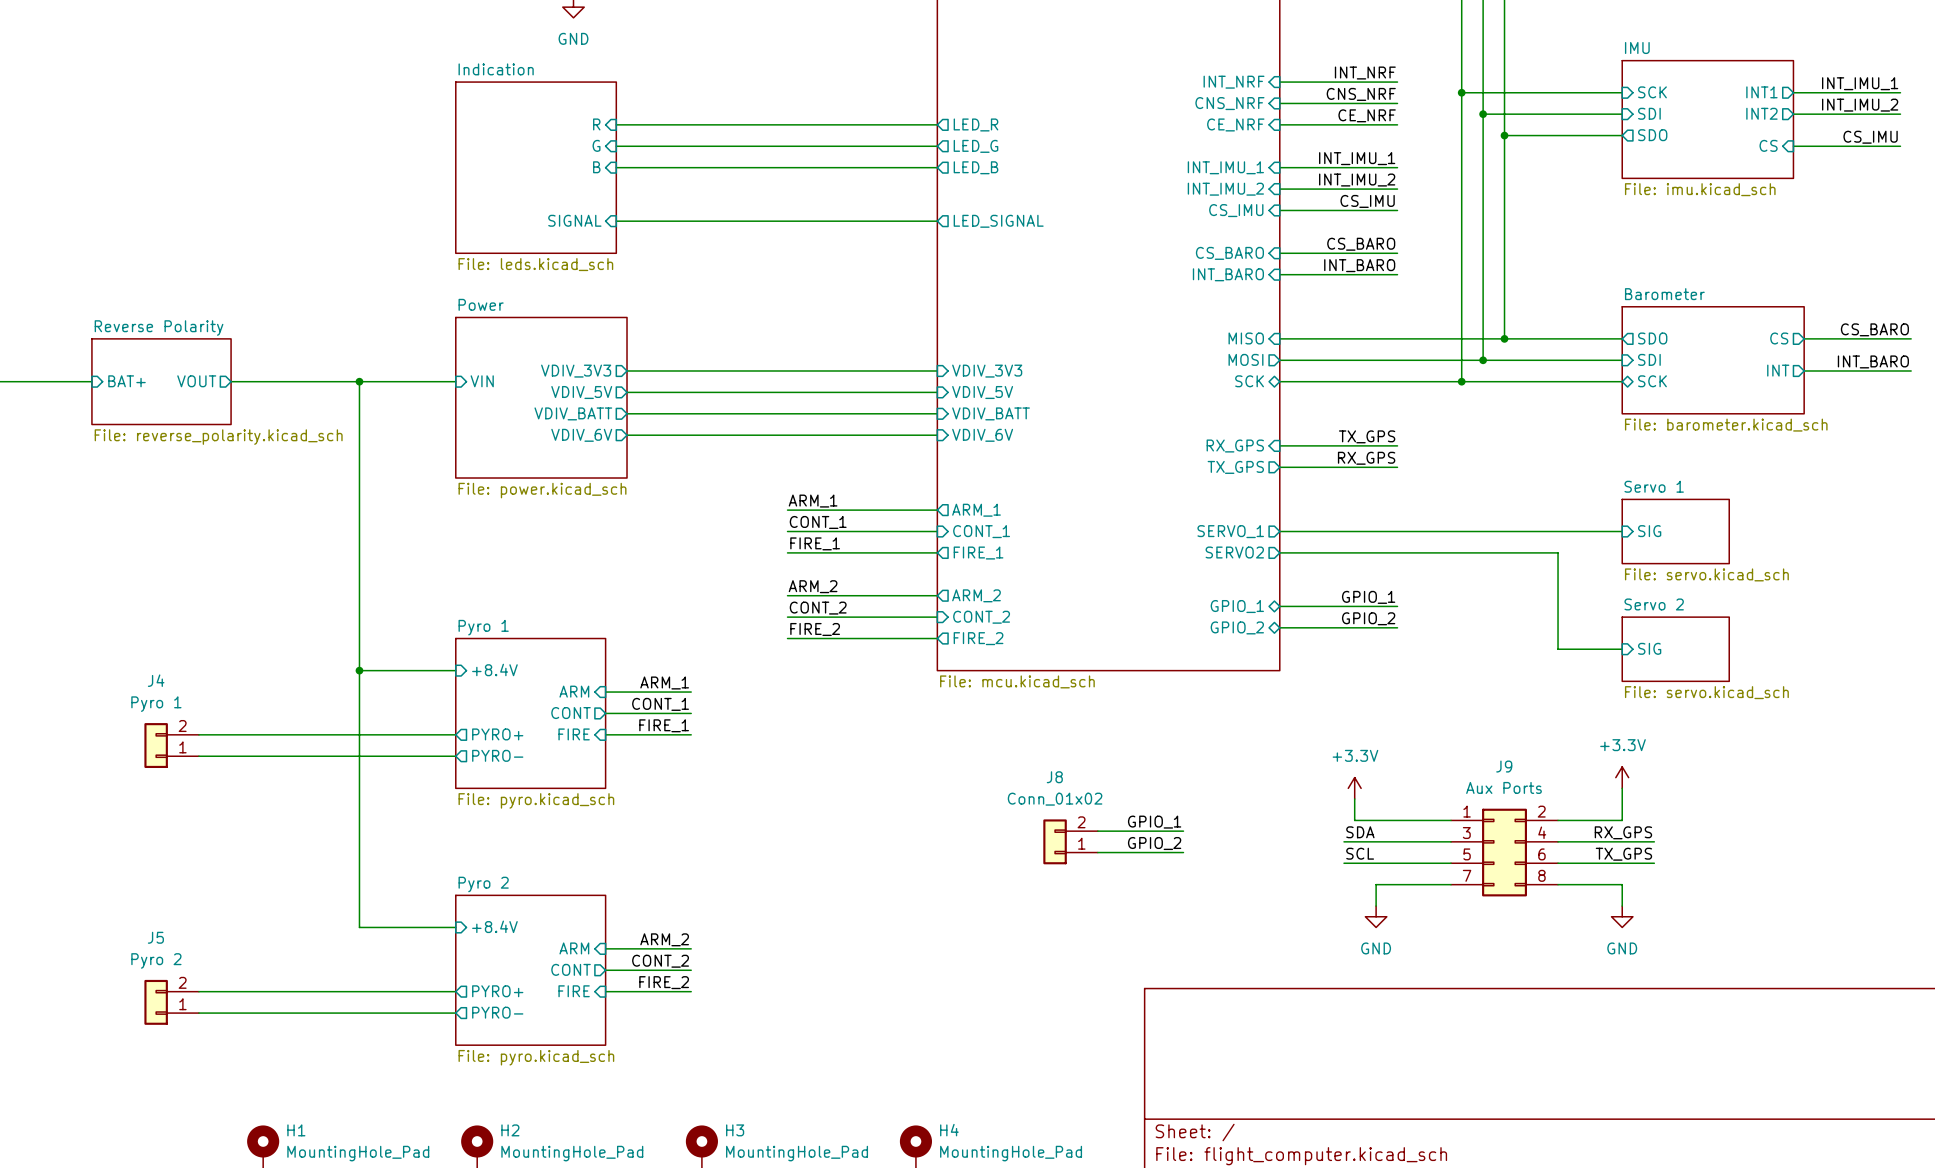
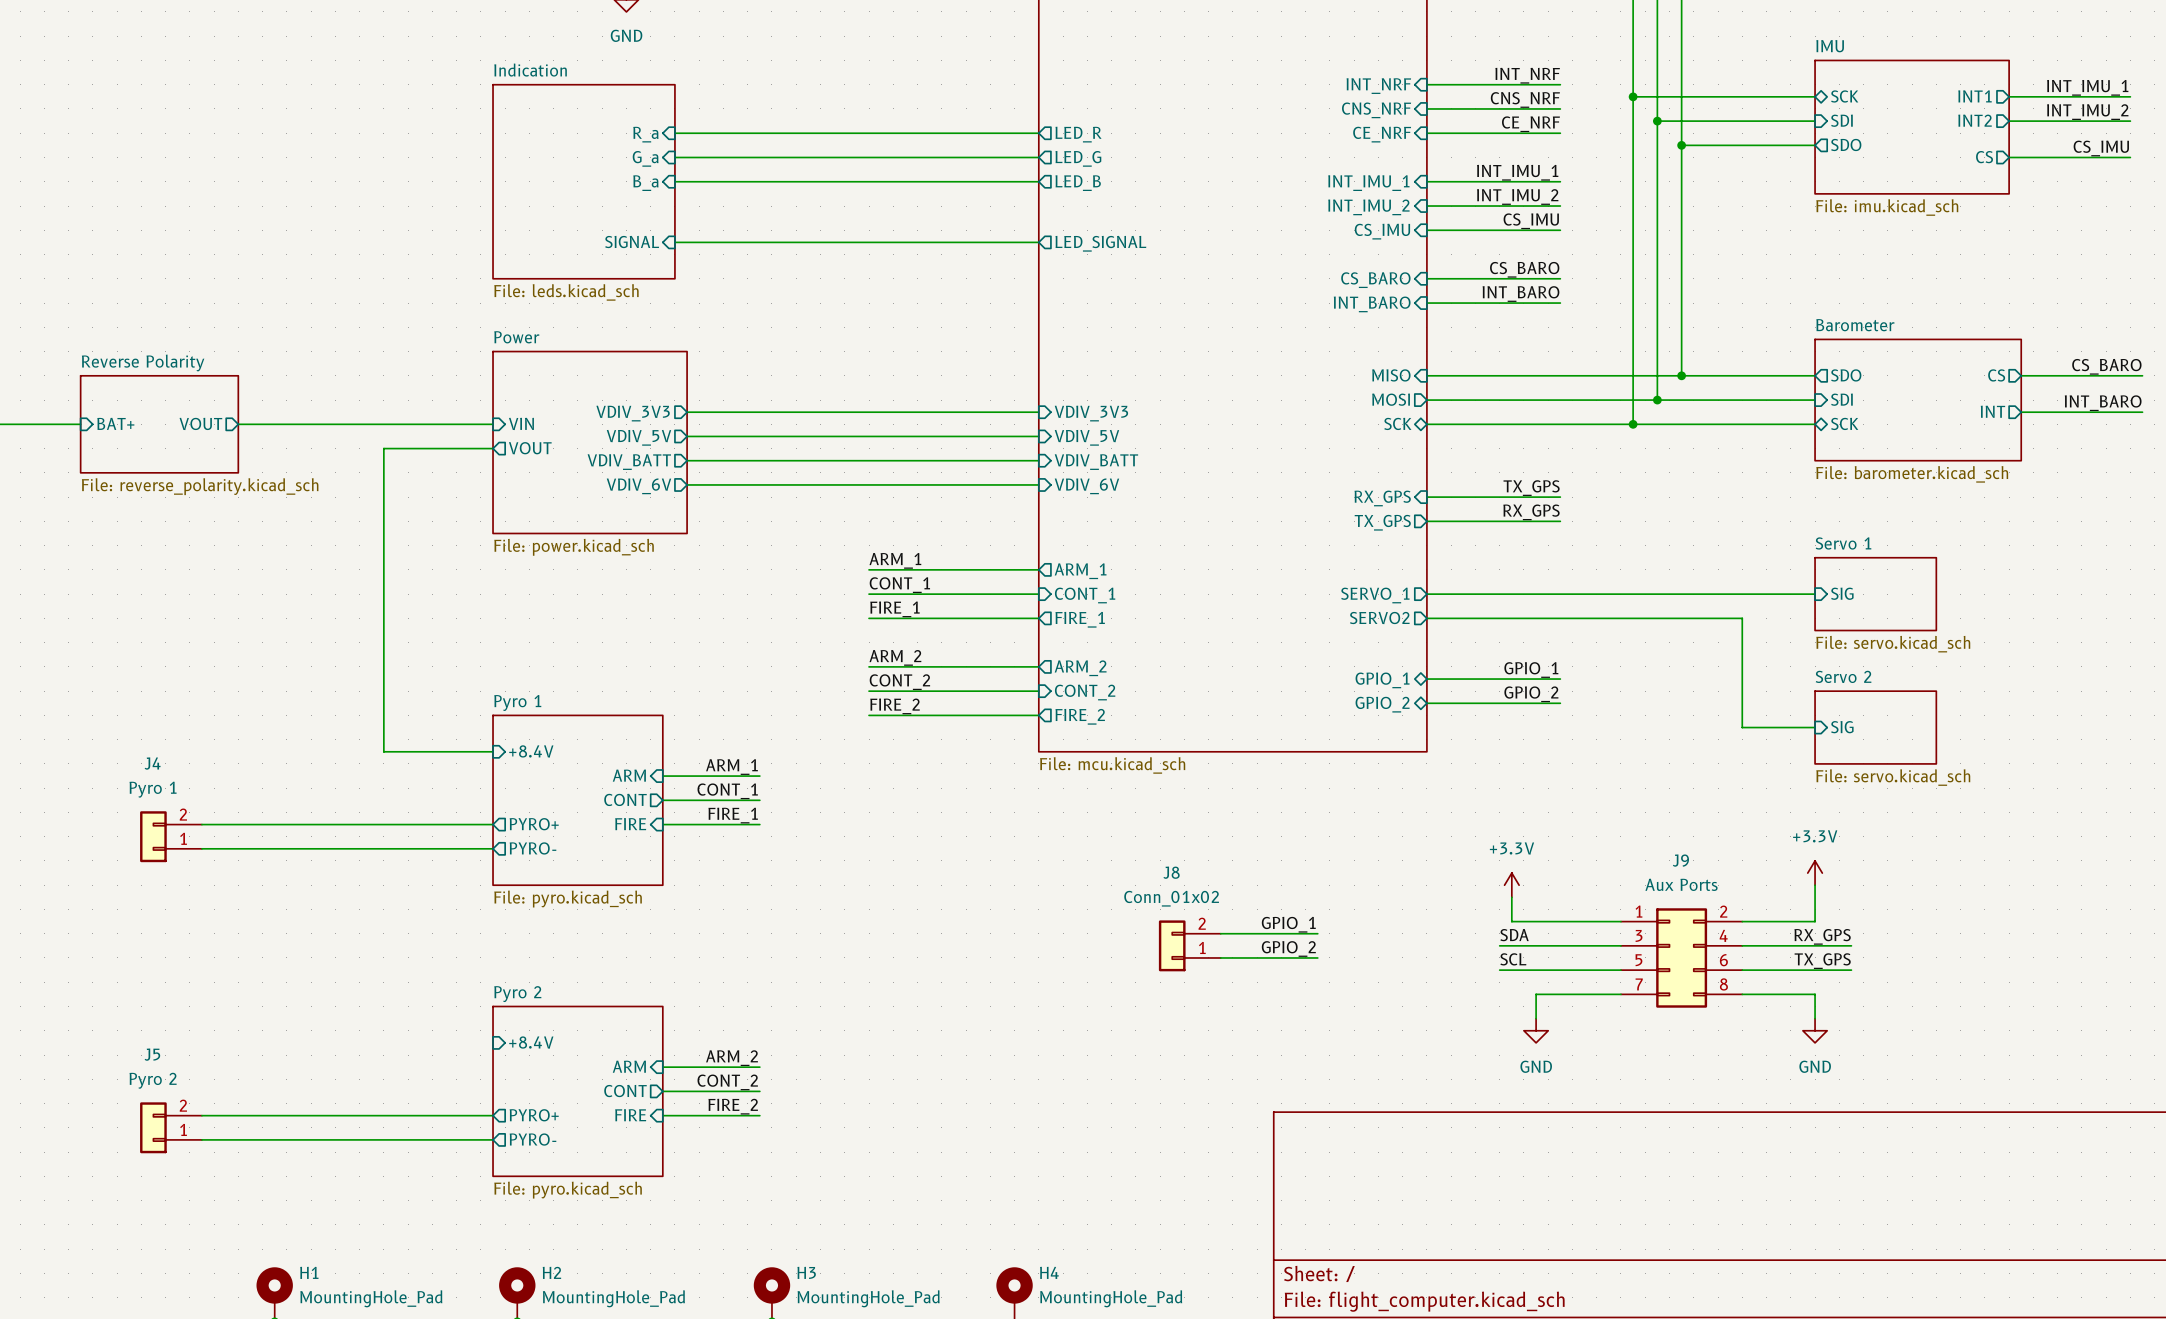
sheet pin shape: input (1652, 92) -> bidirectional (1844, 96)
sheet pin: R (596, 124) -> R_a (645, 134)
sheet pin: G (596, 145) -> G_a (645, 158)
sheet pin shape: input (1768, 145) -> output (1984, 157)
sheet pin: B (596, 167) -> B_a (645, 183)
wire: (359, 381) (359, 403) -> (493, 448) (383, 448)
junction: (359, 381) -> none
sheet pin: none -> VOUT (530, 448)
wire: (359, 670) (359, 927) (455, 927) -> none
junction: (359, 670) -> none

